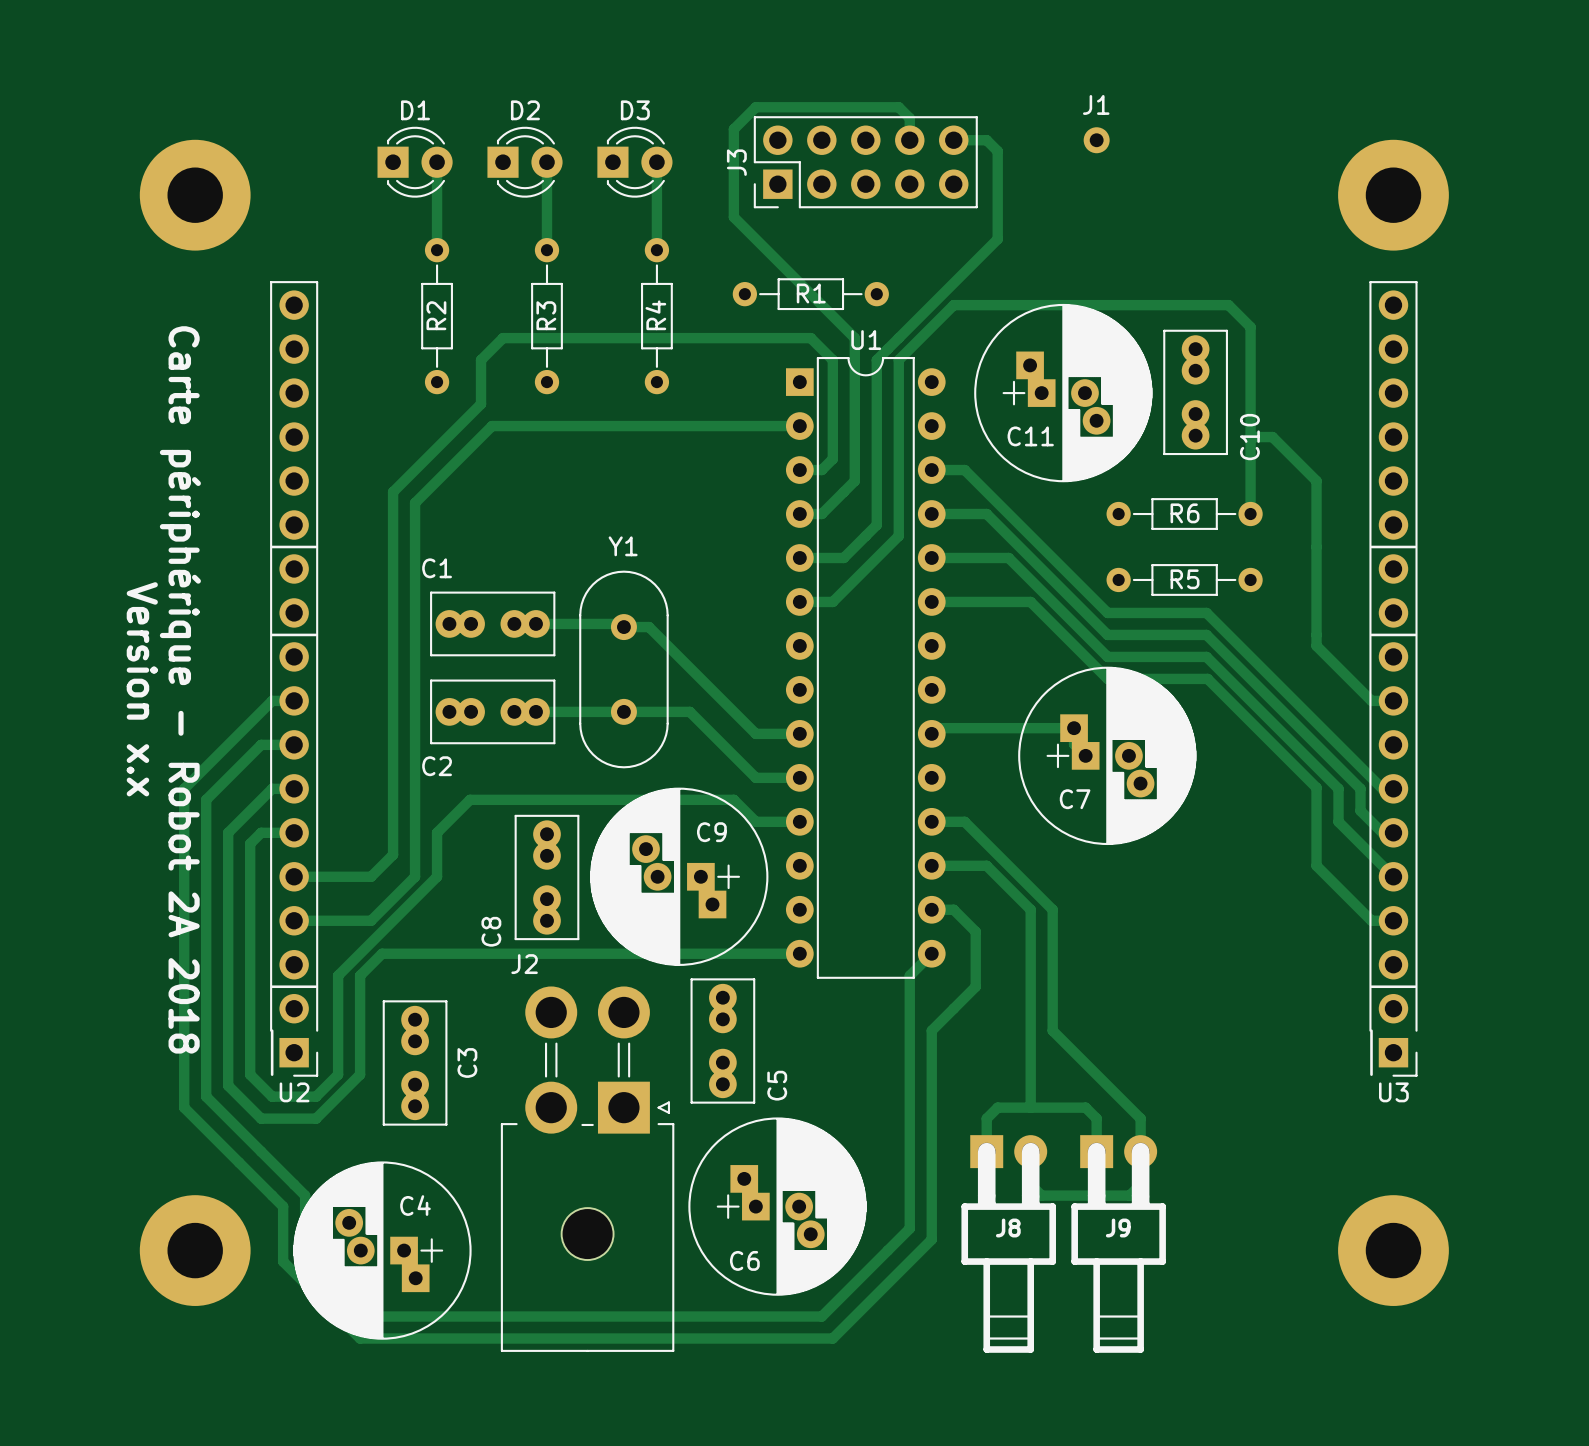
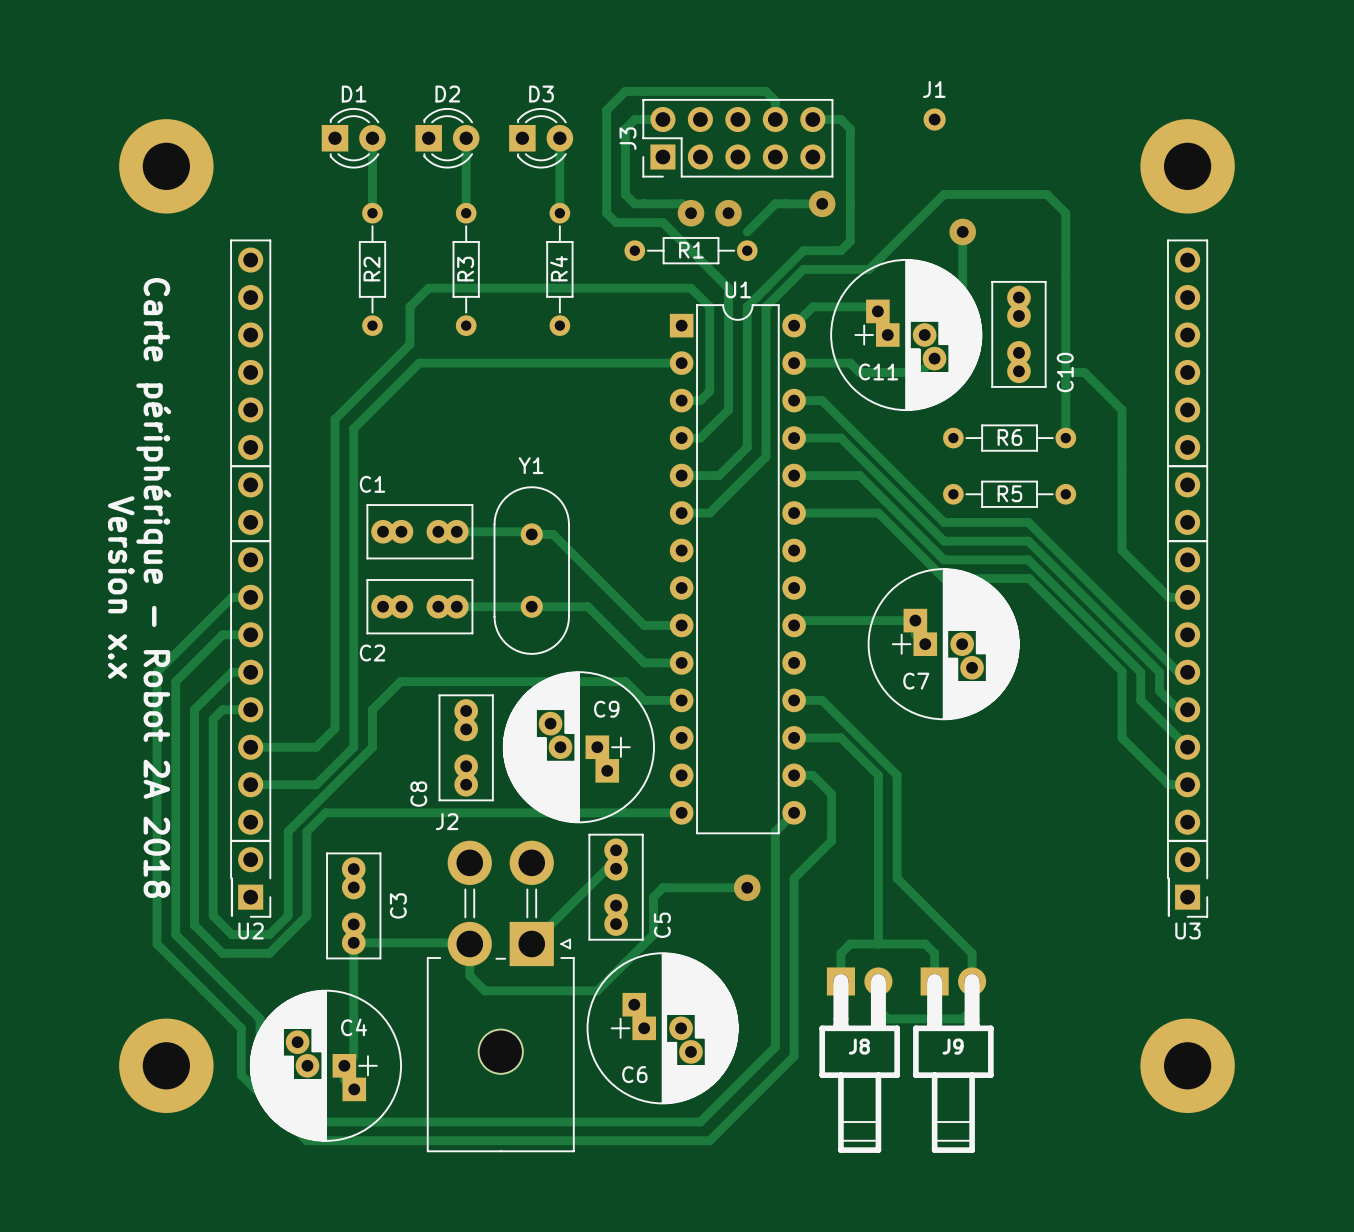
track: (755, 107) (733, 129) (733, 151) -> (662, 119) (634, 119) (625, 128)
track: none -> (644, 91) (625, 91) (606, 110) (606, 213) (616, 222) (662, 222)
track: (733, 217) (777, 261) -> (625, 185) (625, 194) (634, 203) (681, 203) (691, 213)
track: none -> (822, 203) (775, 203) (747, 231)
via: none -> (822, 203)
track: (997, 239) (942, 294) -> (850, 203) (850, 241) (840, 250) (803, 250)
via: none -> (691, 213)
via: none -> (728, 213)
track: none -> (962, 231) (962, 297)
via: none -> (962, 231)
track: (942, 316) (953, 305) (1228, 305) (1250, 327) -> (803, 269) (869, 269) (944, 194) (1047, 194) (1065, 213) (1065, 278)
track: none -> (877, 311) (873, 306) (812, 306) (794, 325)
track: none -> (934, 358) (920, 372) (859, 372) (850, 363) (794, 363)
track: none -> (616, 850) (616, 868) (607, 868) (531, 944)
track: none -> (747, 887) (662, 887) (653, 897) (653, 934) (597, 990) (484, 990) (469, 975) (468, 942) (353, 942)
via: none -> (747, 887)
track: none -> (353, 924) (353, 1056) (344, 1065) (344, 1079) (354, 1089)

